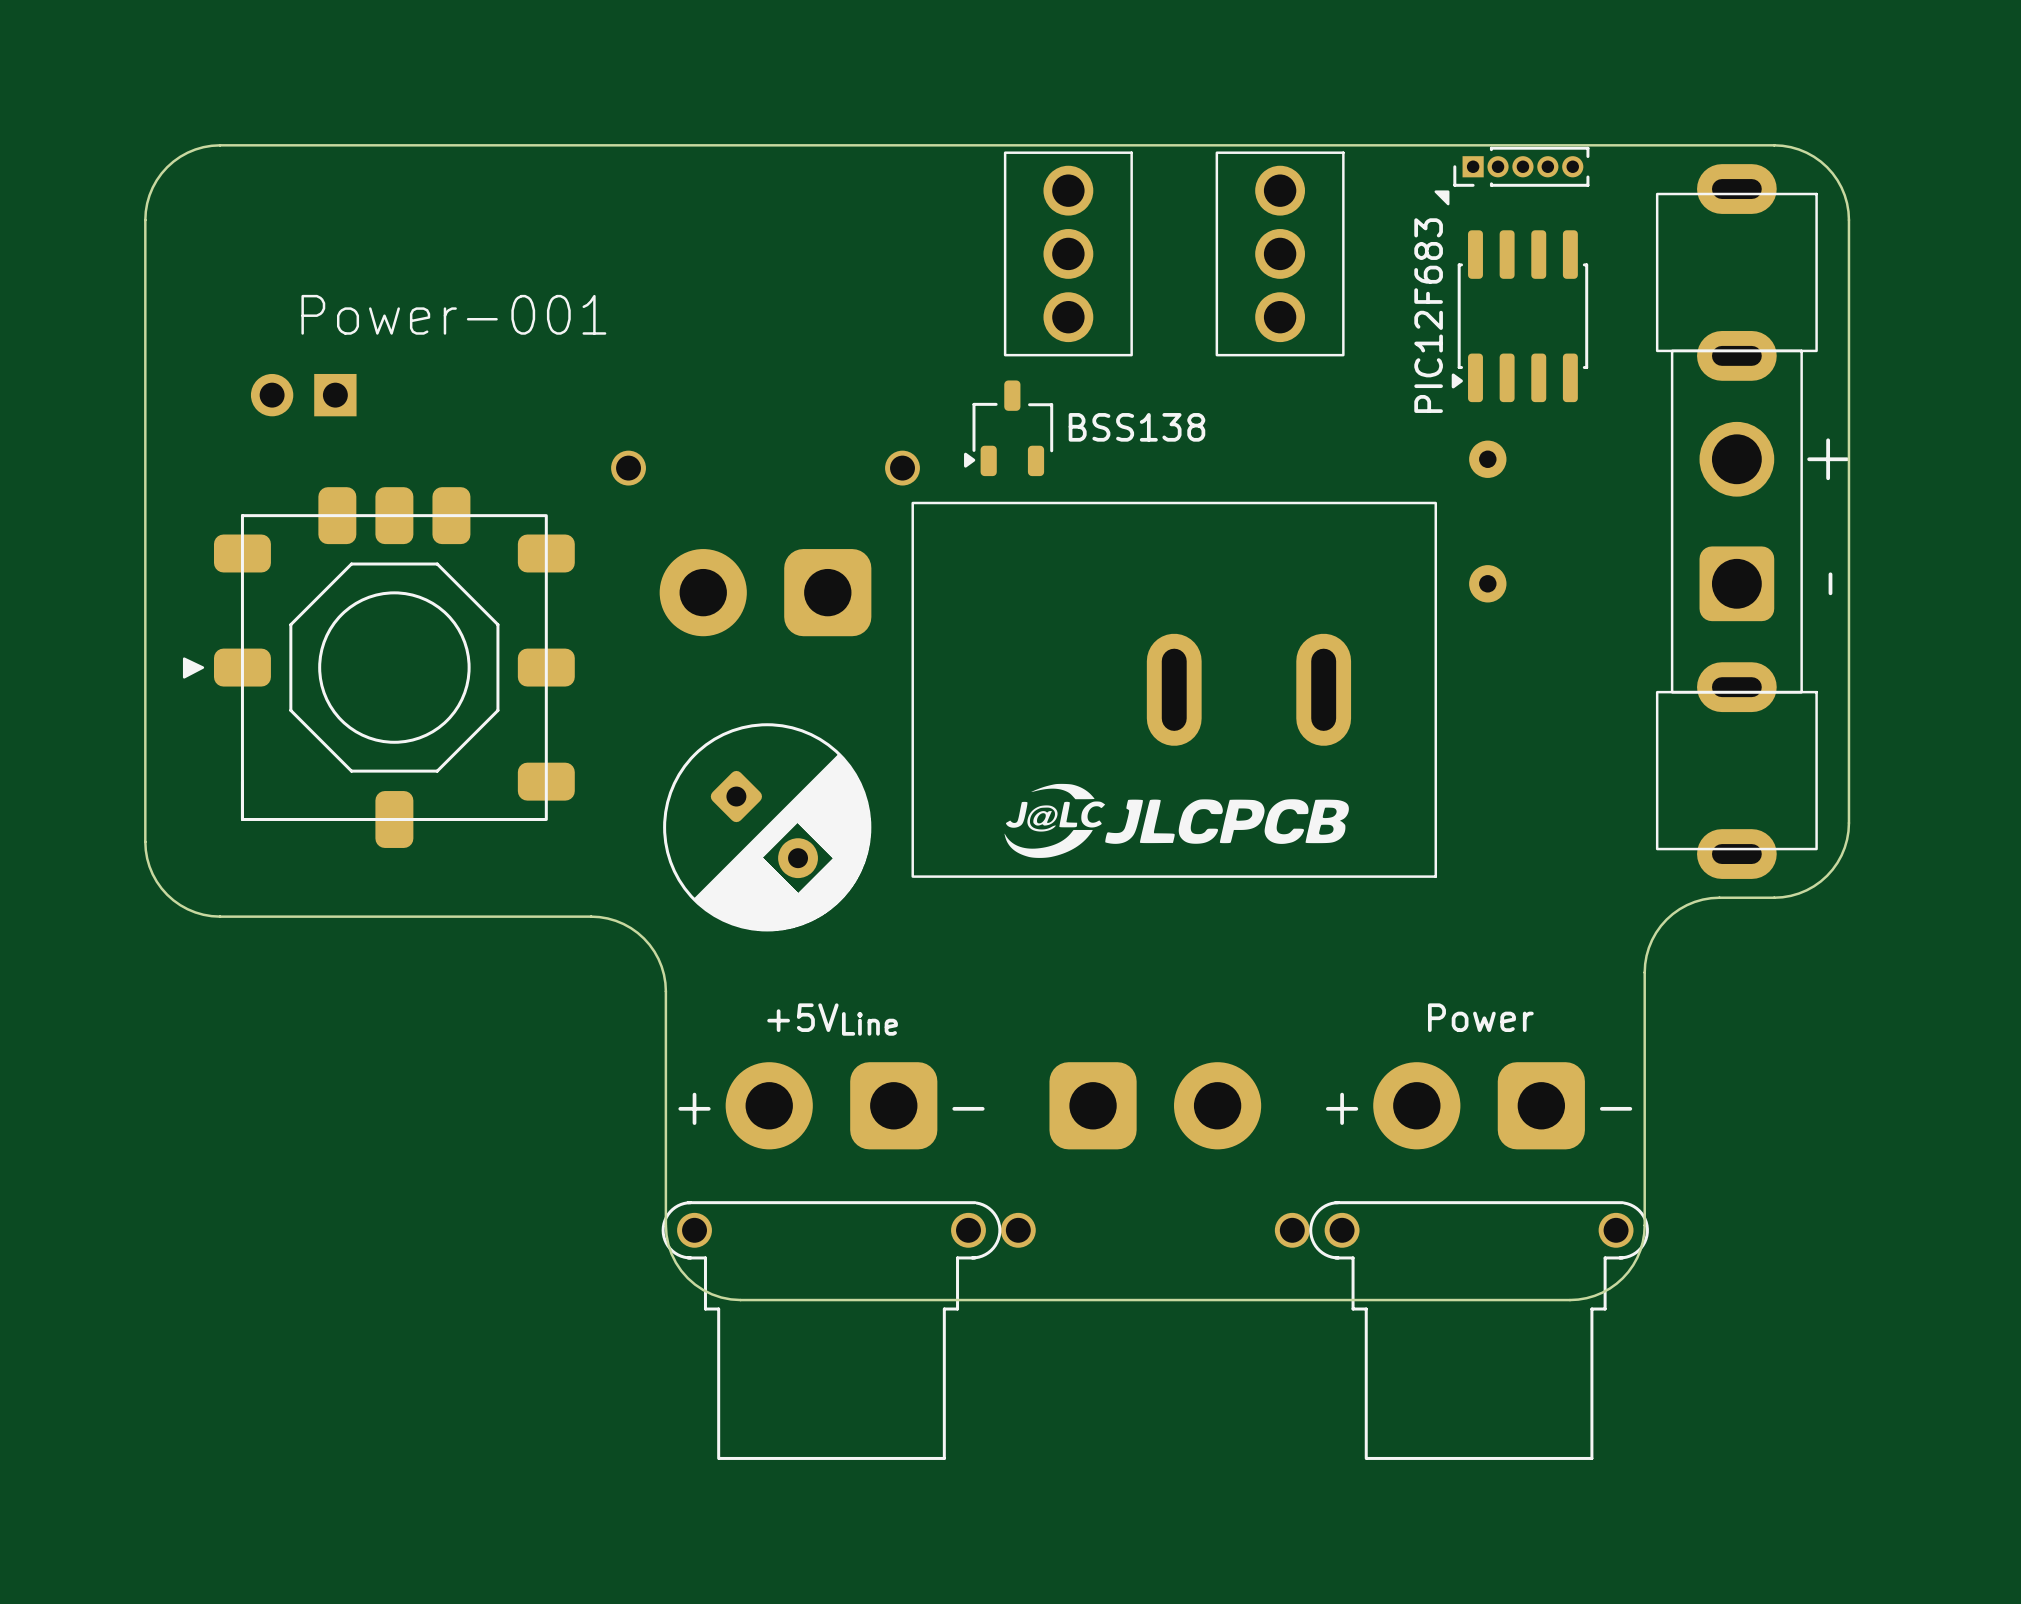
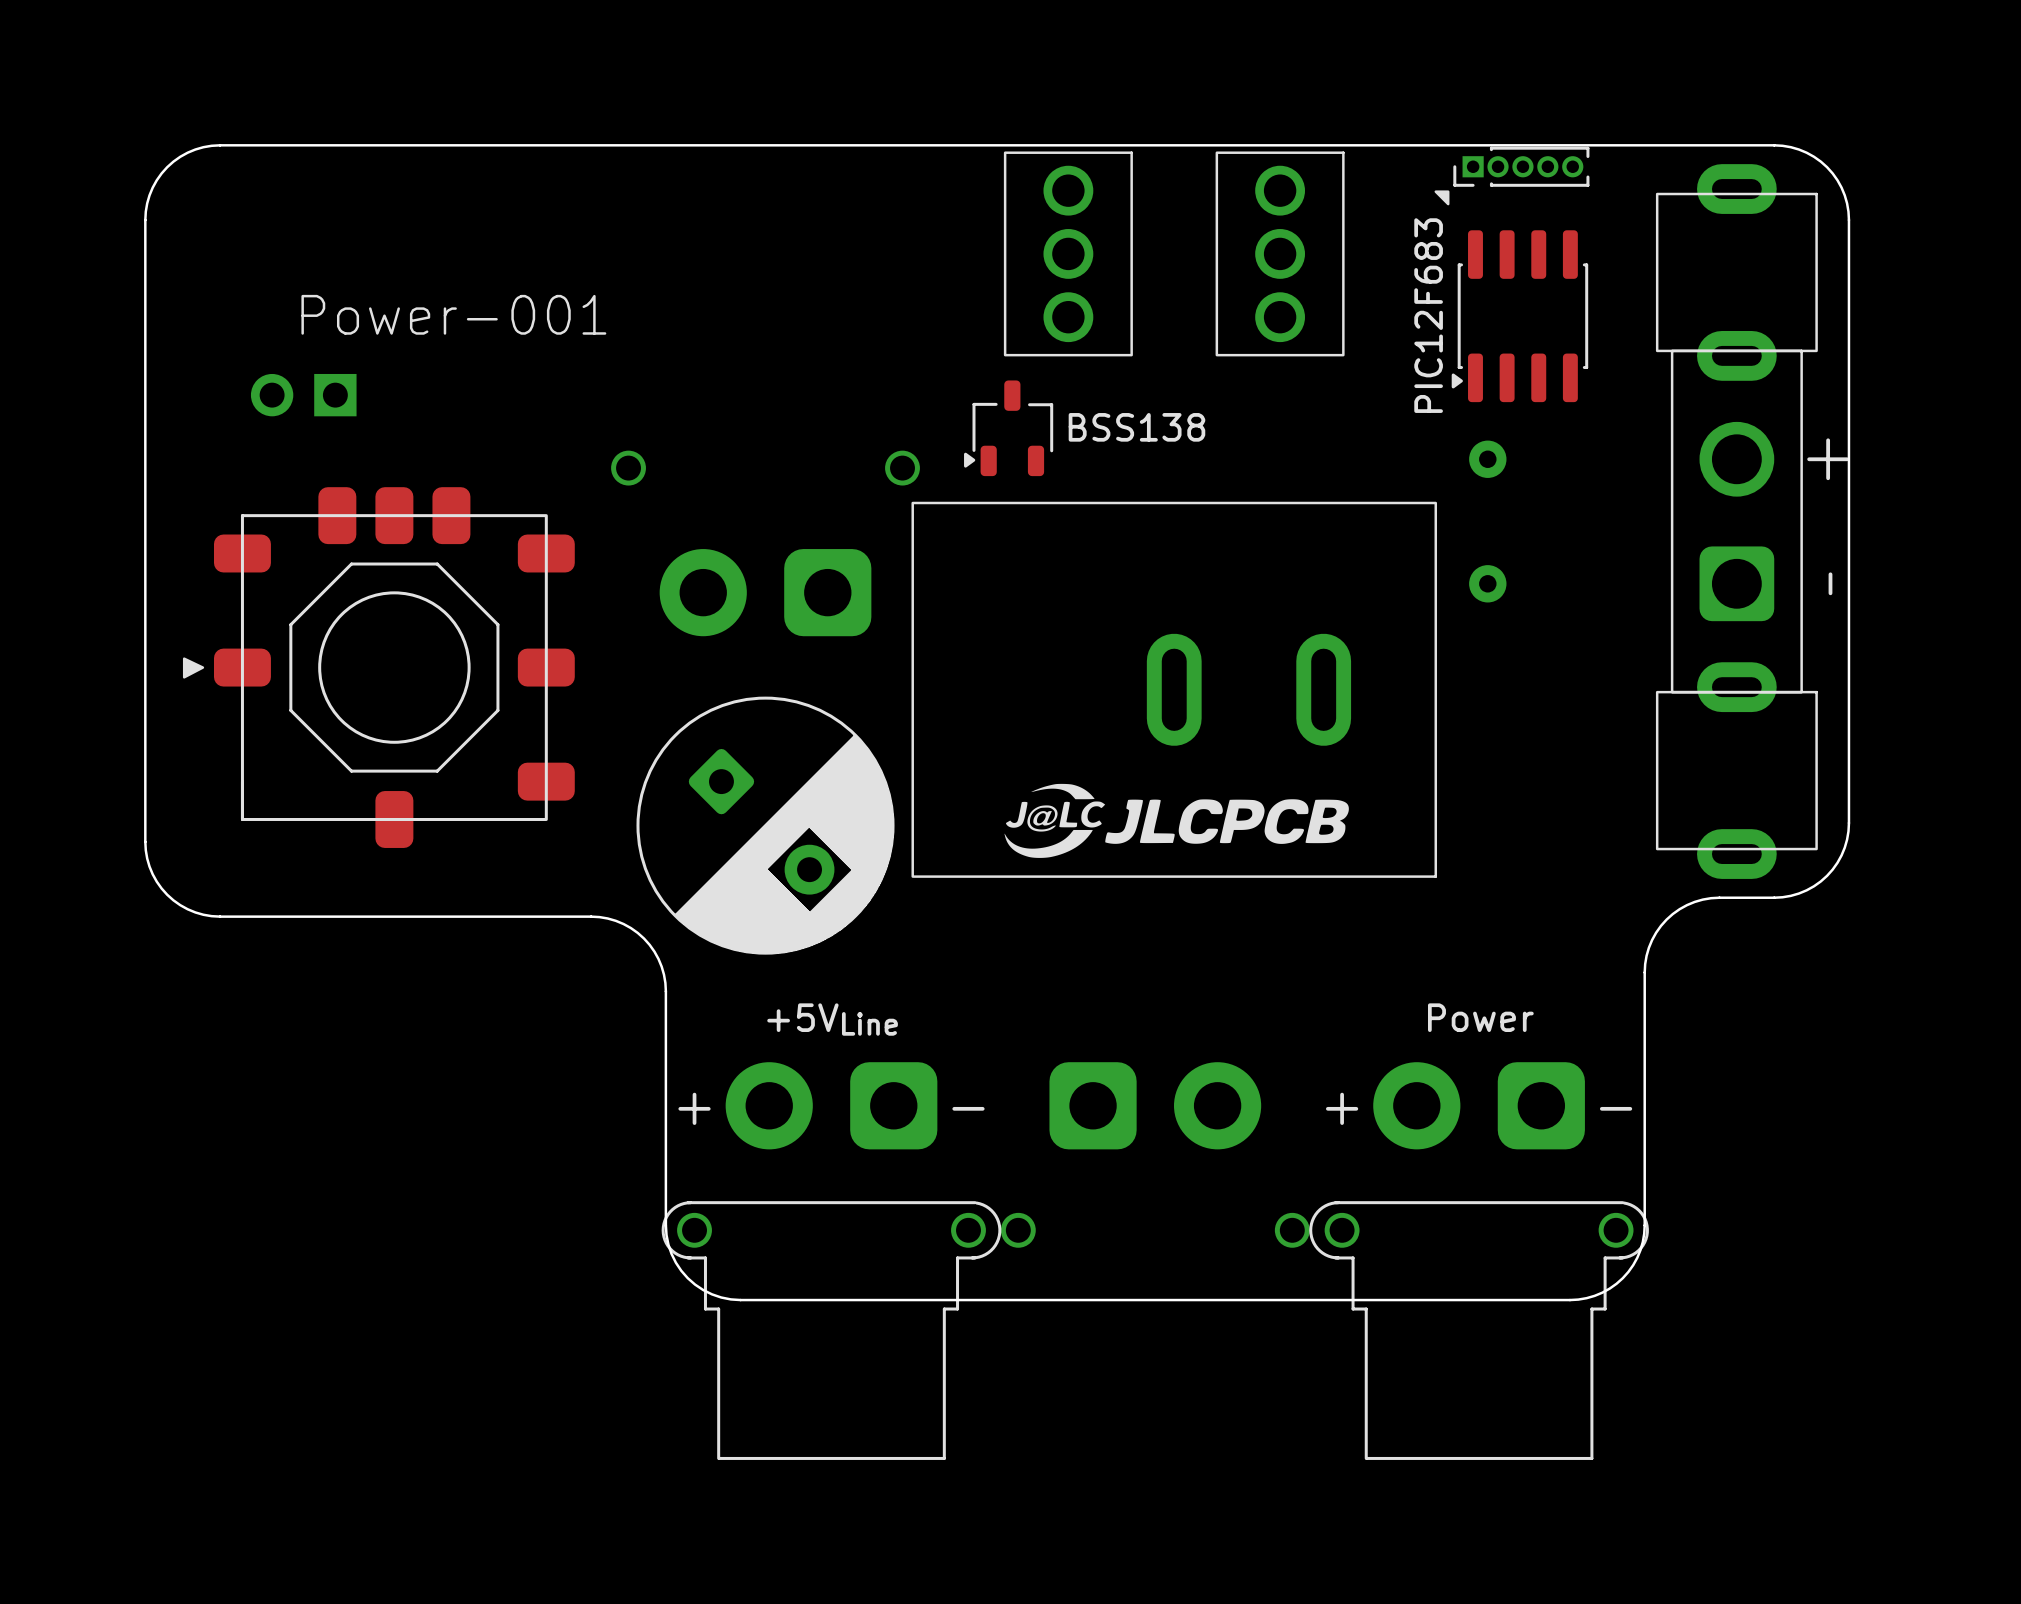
part footprint: [663, 723, 872, 932] -> [636, 696, 895, 955]

